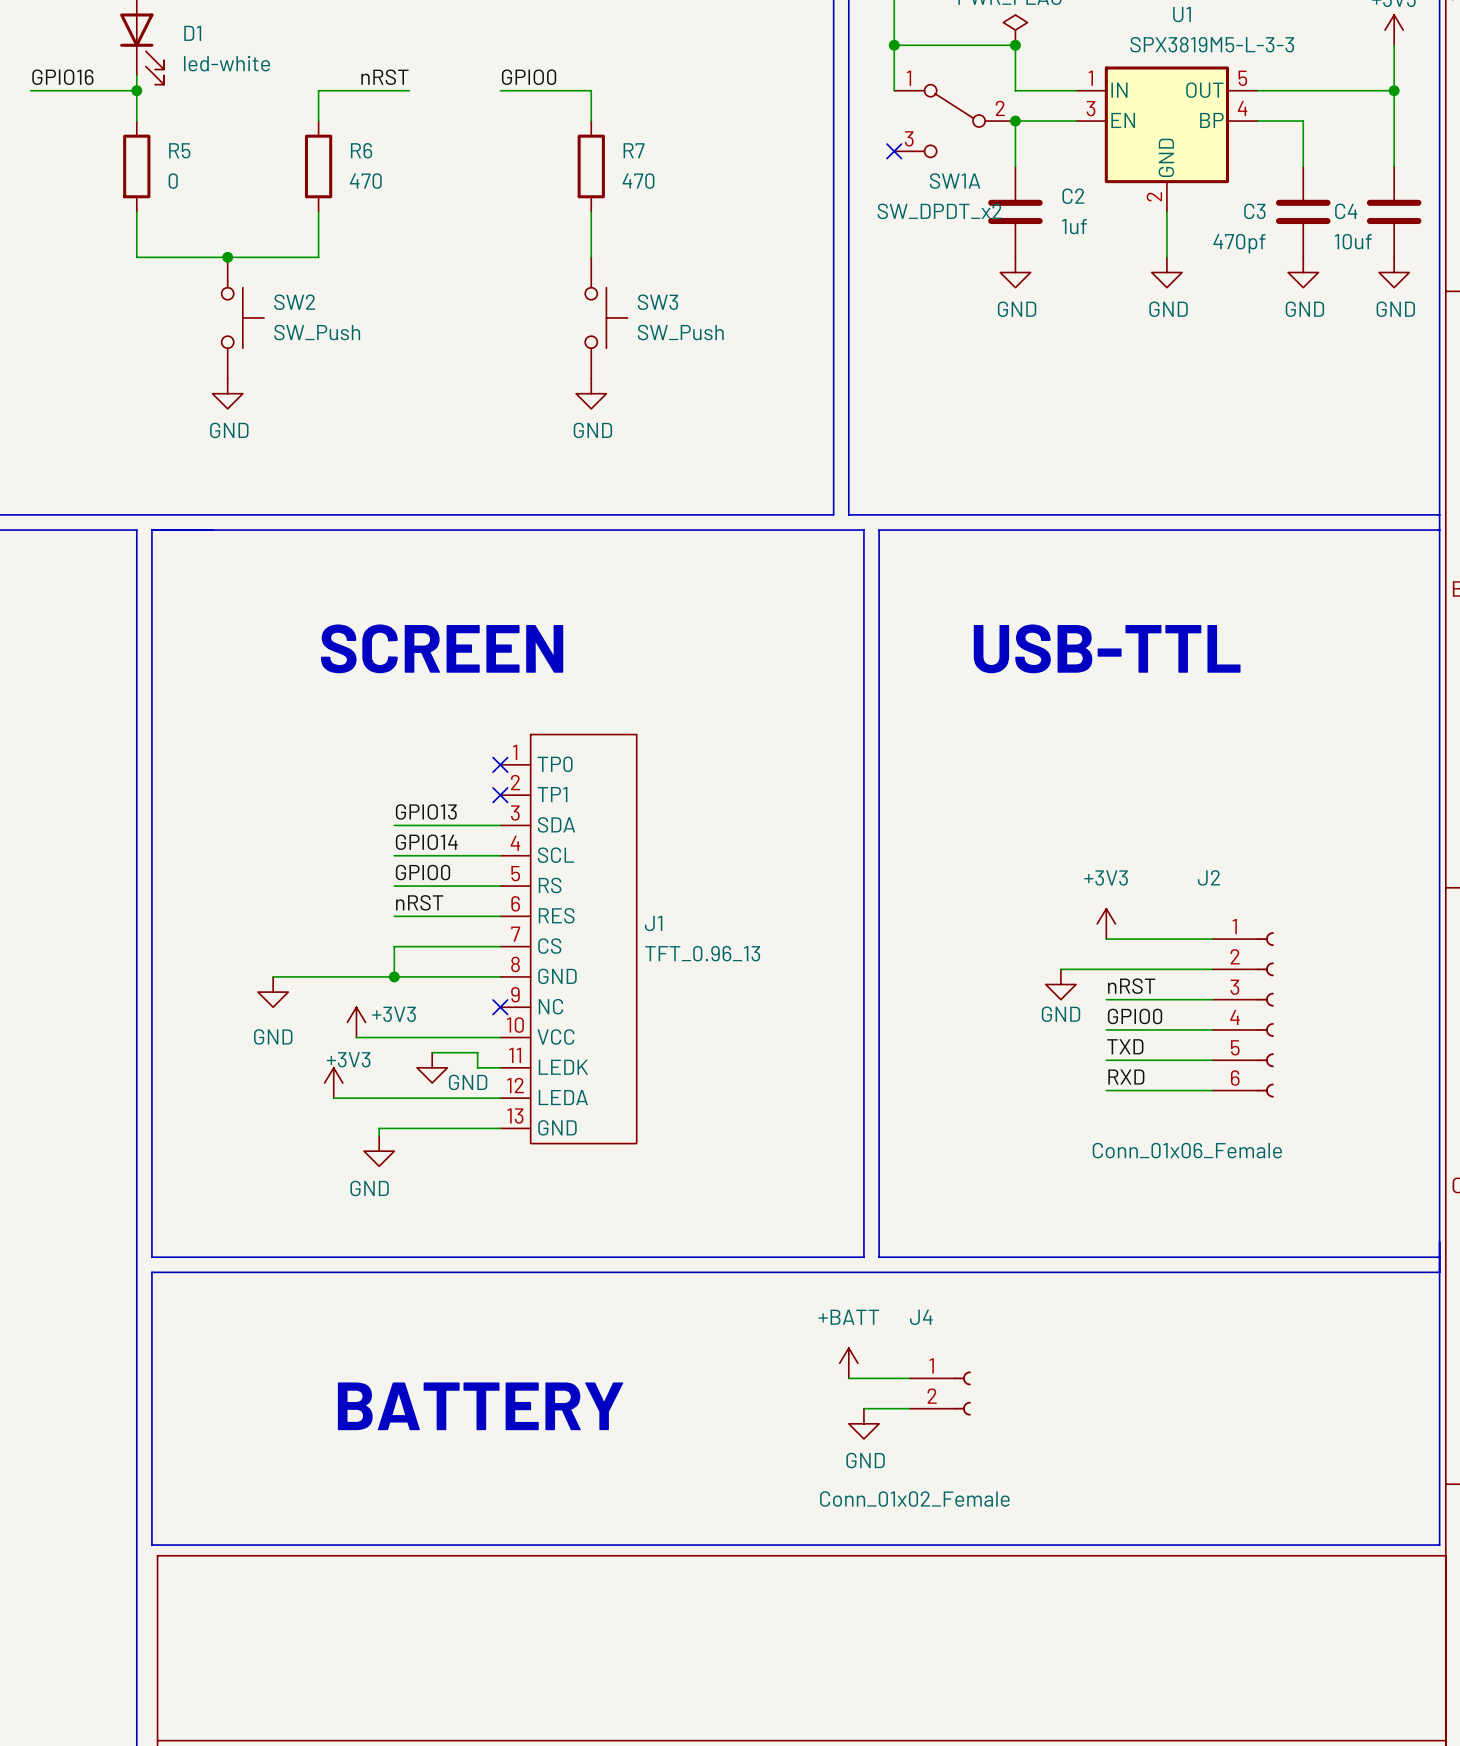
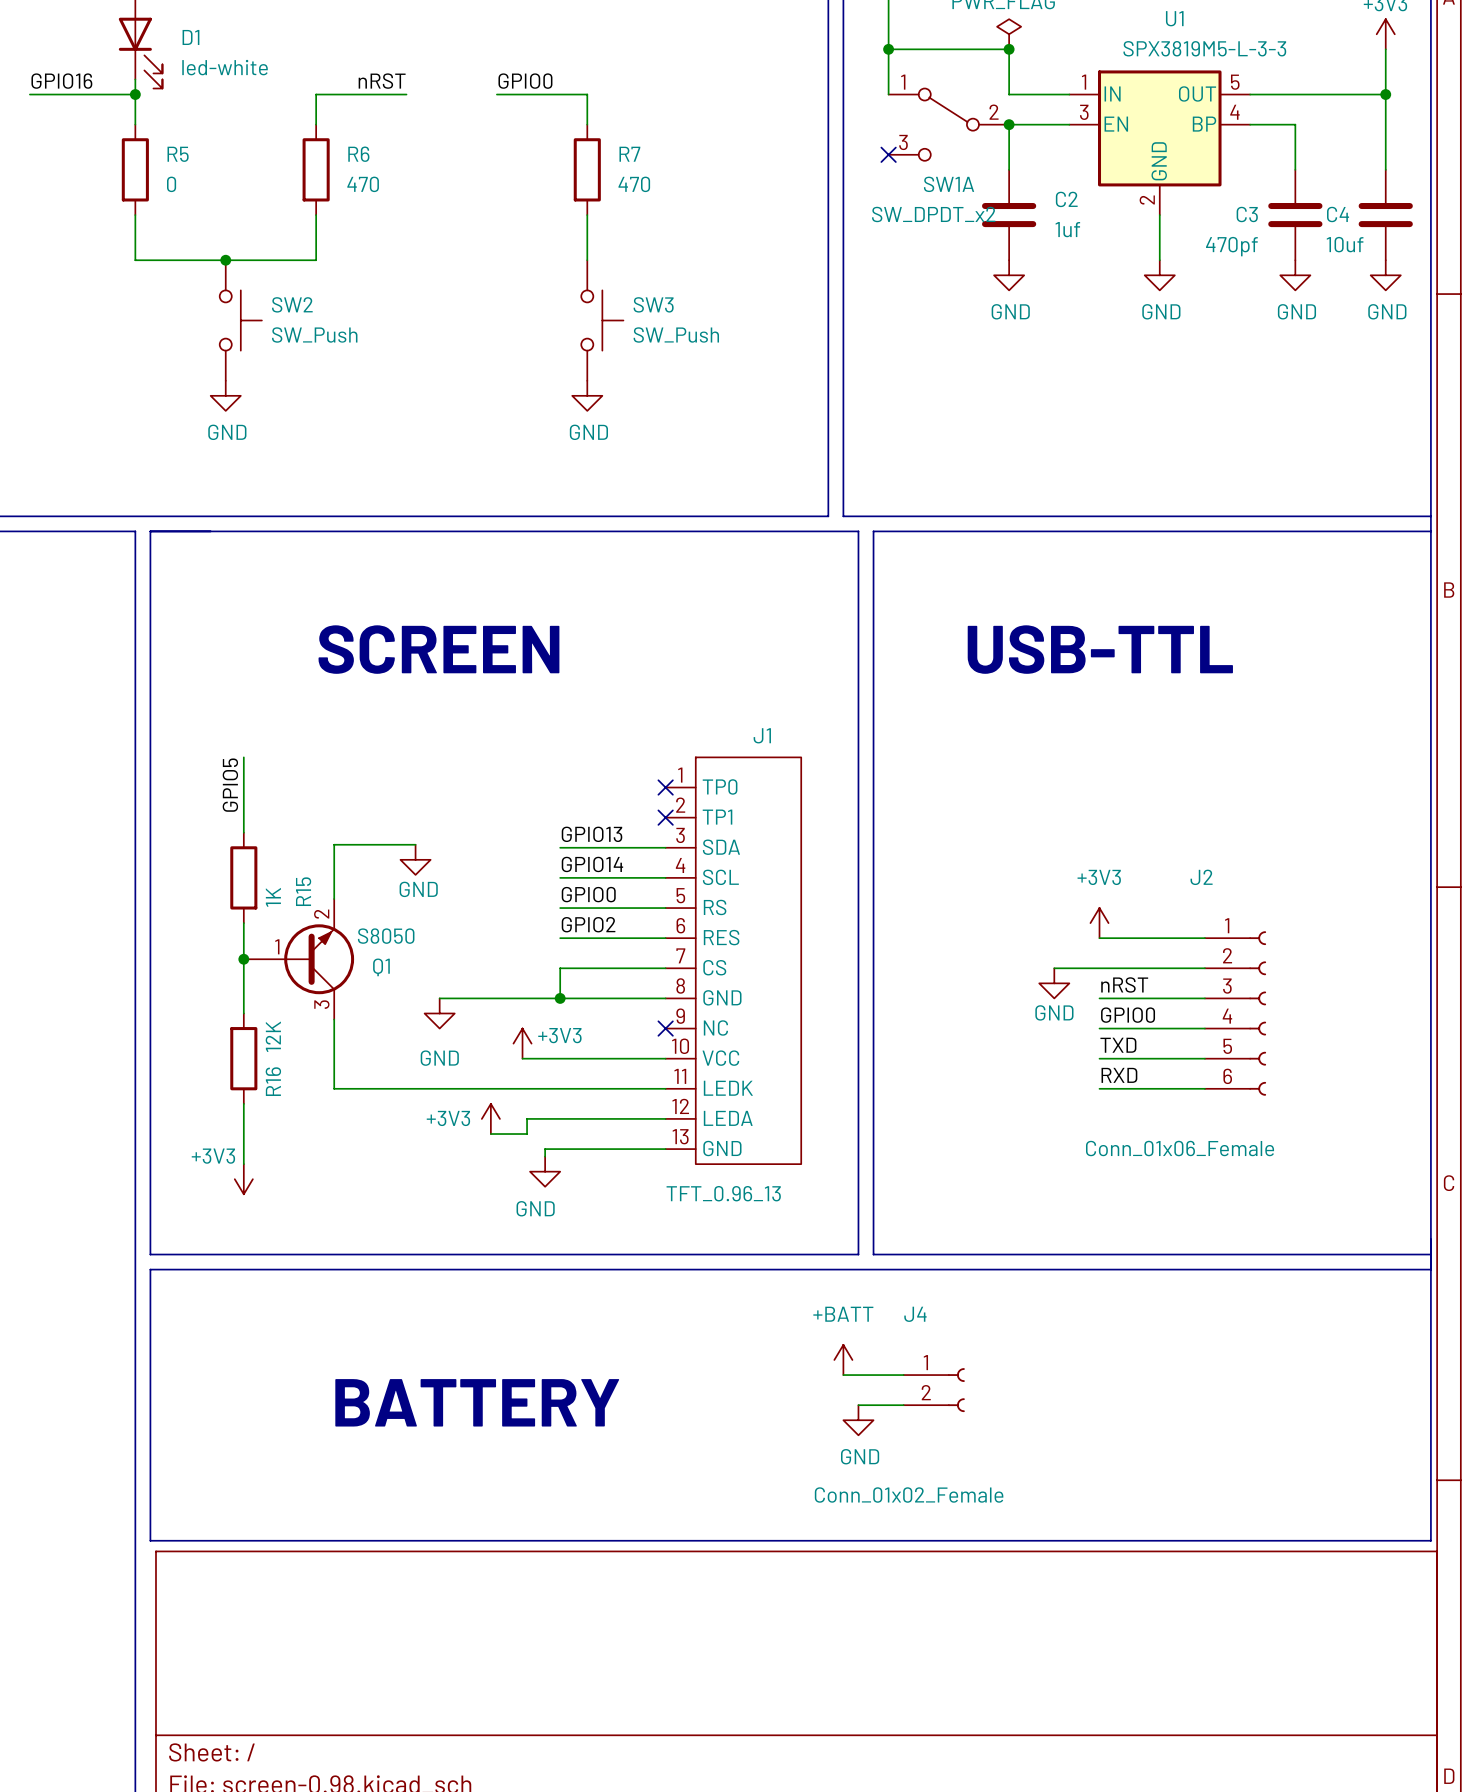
wire: none -> (243, 757) (243, 832)
no-connect mark: (500, 764) -> none
label: none -> GPIO5 (230, 785)
no-connect mark: none -> (665, 787)
no-connect mark: (500, 795) -> none
label position: GPIO13 (426, 811) -> GPIO13 (592, 834)
no-connect mark: none -> (665, 817)
wire: (394, 825) (500, 825) -> (560, 847) (665, 847)
label position: GPIO14 (426, 842) -> GPIO14 (592, 864)
wire: none -> (415, 844) (334, 844) (334, 898)
wire: (394, 855) (500, 855) -> (560, 877) (665, 877)
power symbol: none -> GND (415, 859)
label position: GPIO0 (423, 872) -> GPIO0 (588, 894)
R15: none -> 1K (243, 877)
wire: (394, 886) (500, 886) -> (560, 908) (665, 908)
label: nRST (419, 902) -> none
wire: (394, 916) (500, 916) -> (560, 938) (665, 938)
wire: none -> (243, 923) (243, 1013)
J1 name position: J1 (653, 923) -> J1 (762, 735)
label: none -> GPIO2 (588, 924)
J1 position: (568, 939) -> (733, 960)
wire: (500, 946) (394, 946) (394, 976) -> (665, 968) (560, 968) (560, 998)
J1 value position: TFT_0.96_13 (702, 953) -> TFT_0.96_13 (723, 1193)
junction: none -> (243, 959)
Q1: none -> S8050 (298, 959)
wire: (273, 976) (500, 976) -> (439, 998) (665, 998)
junction: (394, 976) -> none
power symbol: GND (273, 992) -> none
junction: none -> (560, 998)
no-connect mark: (500, 1007) -> none
wire: none -> (334, 1019) (334, 1088) (665, 1088)
power symbol: +3V3 (356, 1022) -> none
no-connect mark: none -> (665, 1028)
wire: (356, 1037) (500, 1037) -> (522, 1058) (665, 1058)
power symbol: none -> +3V3 (522, 1043)
wire: (432, 1052) (477, 1052) (477, 1067) (500, 1067) -> none
R16: none -> 12K (243, 1058)
power symbol position: GND (432, 1067) -> GND (439, 1013)
power symbol: +3V3 (333, 1082) -> none
power symbol text position: GND (468, 1082) -> GND (439, 1058)
wire: (333, 1098) (500, 1098) -> none
wire: none -> (243, 1103) (243, 1164)
power symbol: none -> +3V3 (490, 1118)
wire: none -> (665, 1118) (527, 1118) (527, 1134) (490, 1134)
wire: (500, 1128) (379, 1128) (379, 1136) -> (665, 1149) (545, 1149) (545, 1156)
power symbol: GND (379, 1151) -> none
power symbol: none -> GND (545, 1171)
power symbol: none -> +3V3 (243, 1179)

